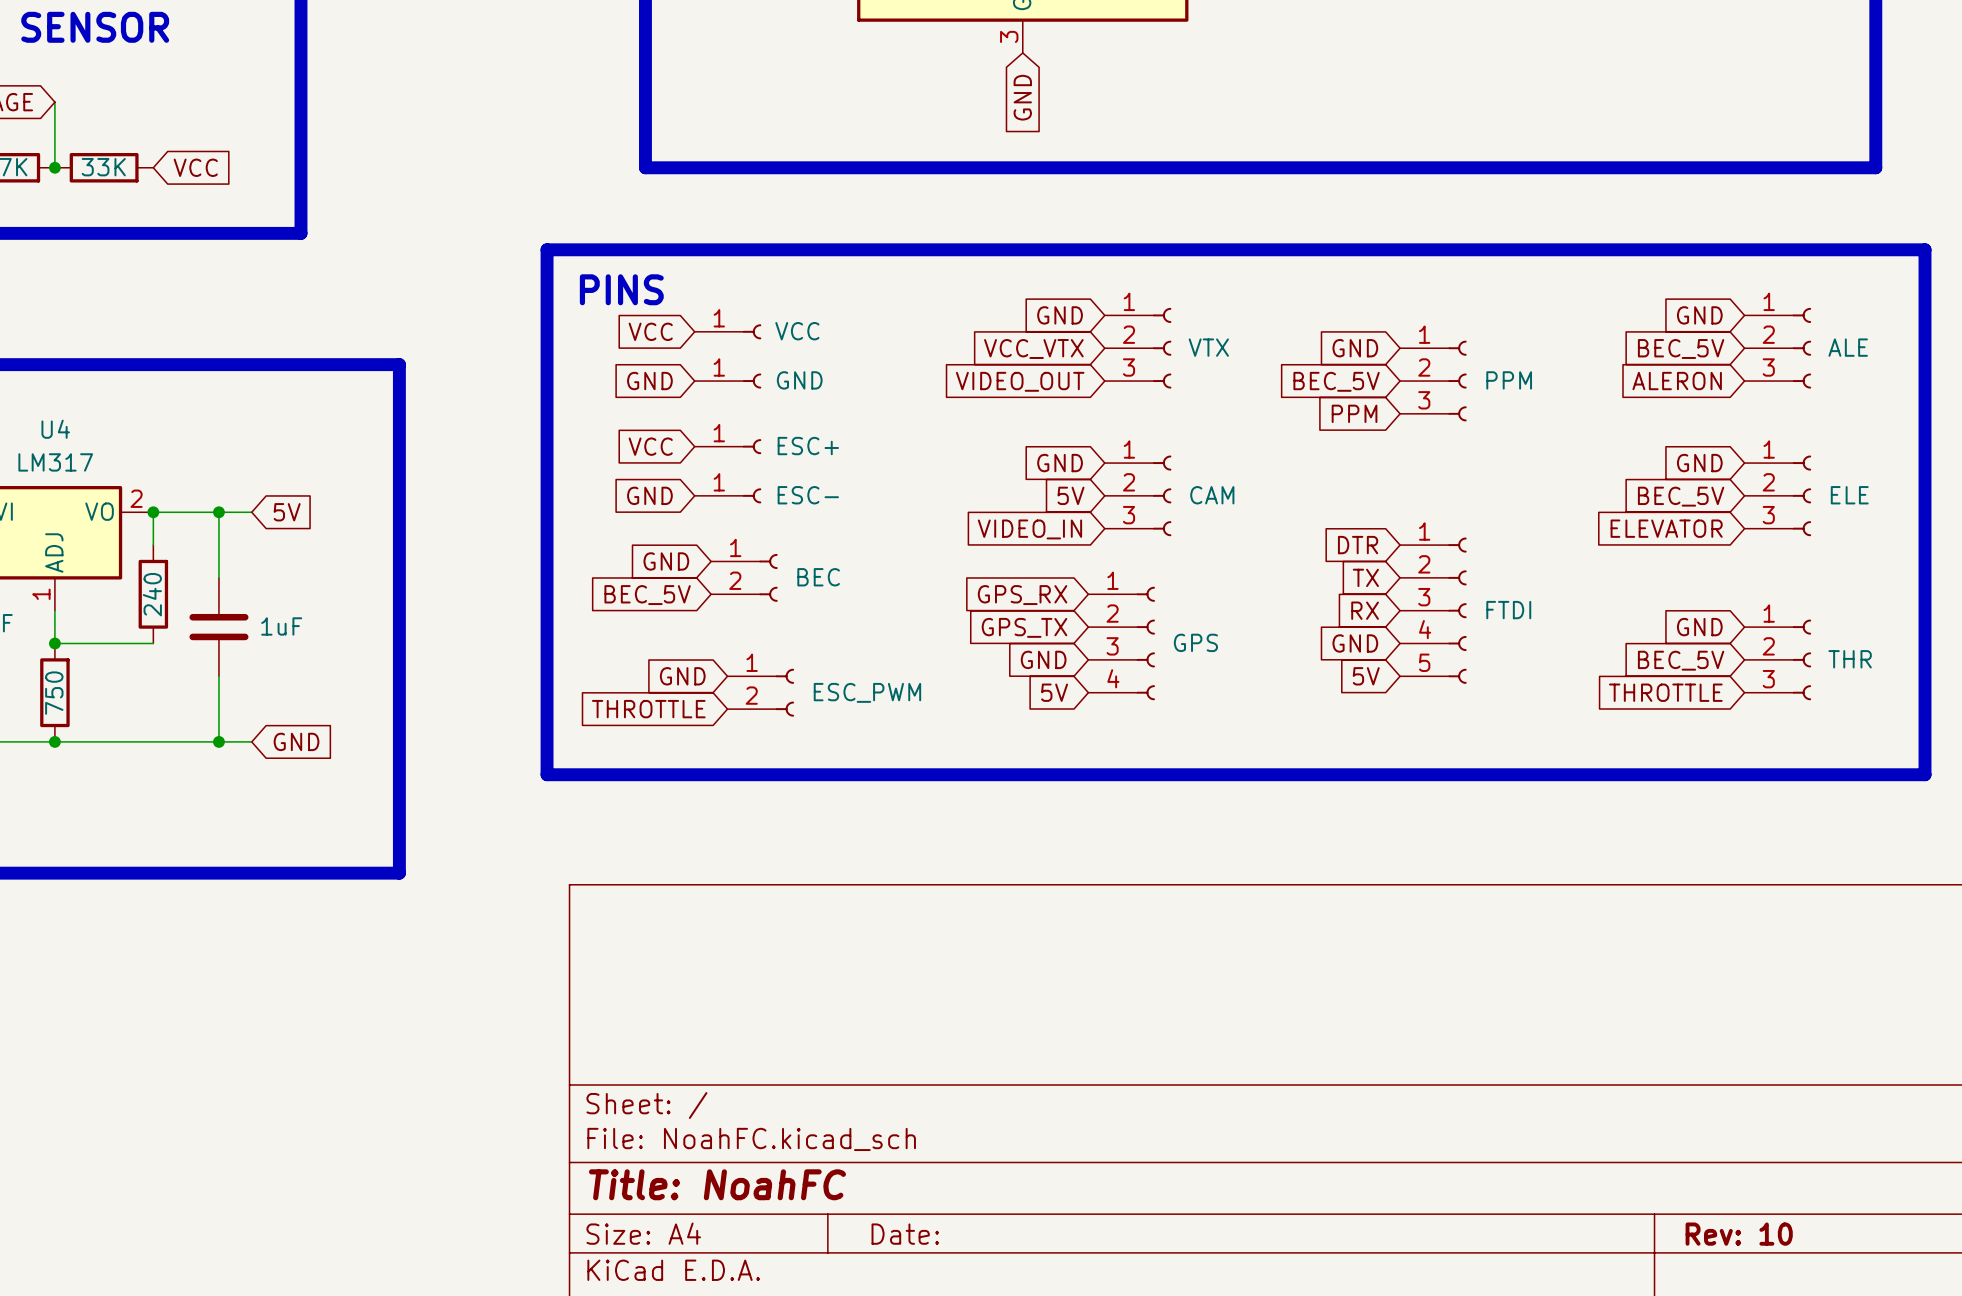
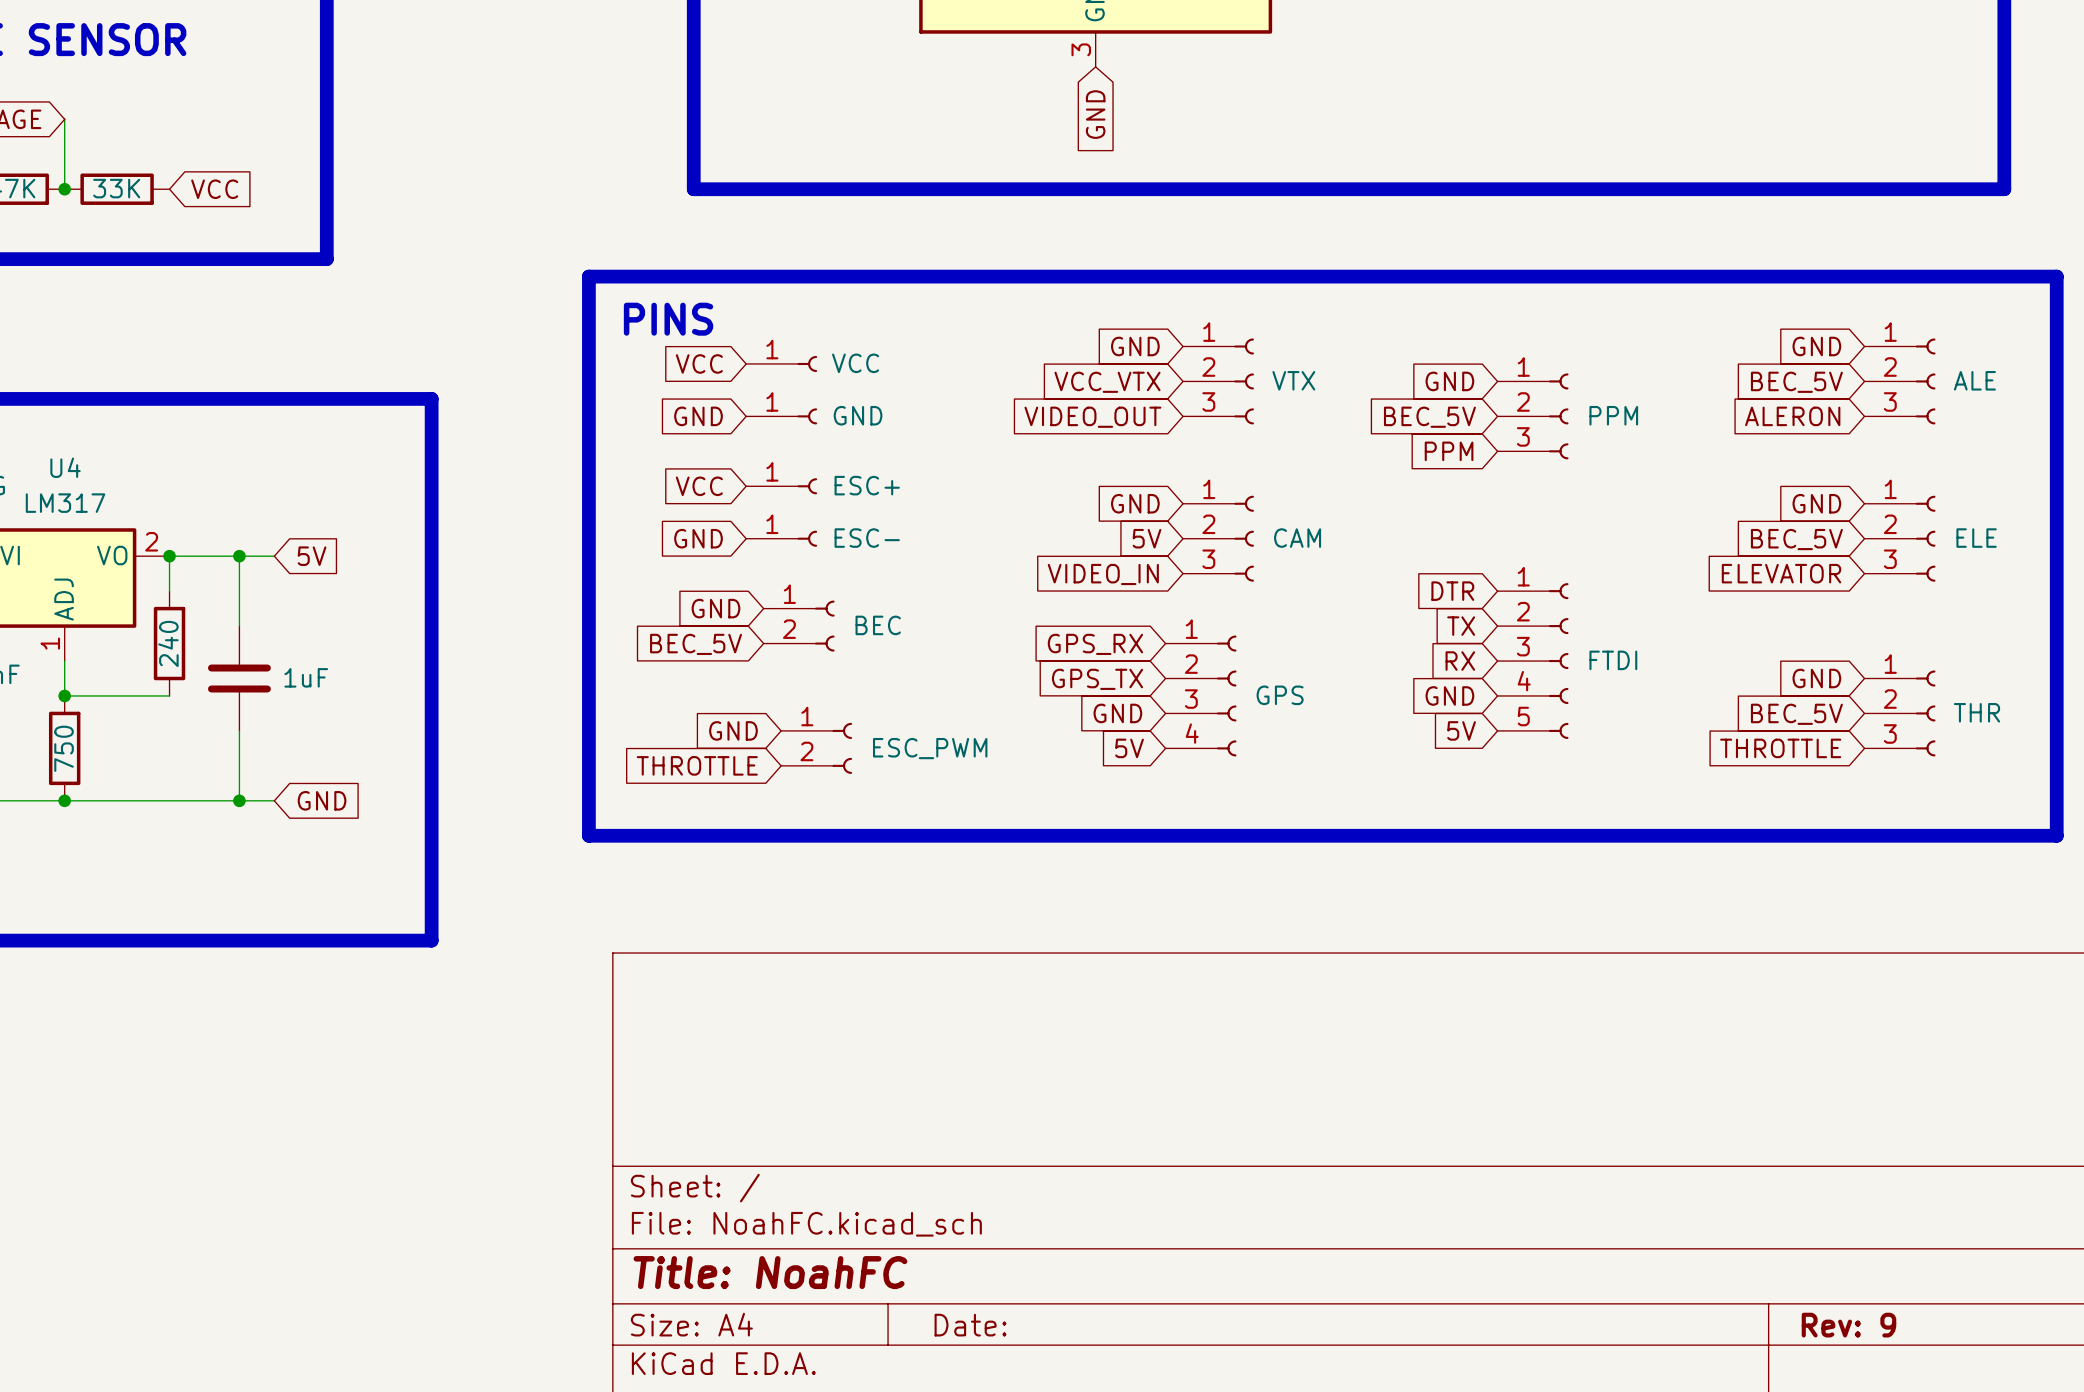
title block: Rev: 10 (1739, 1234) -> Rev: 9 (1848, 1325)

